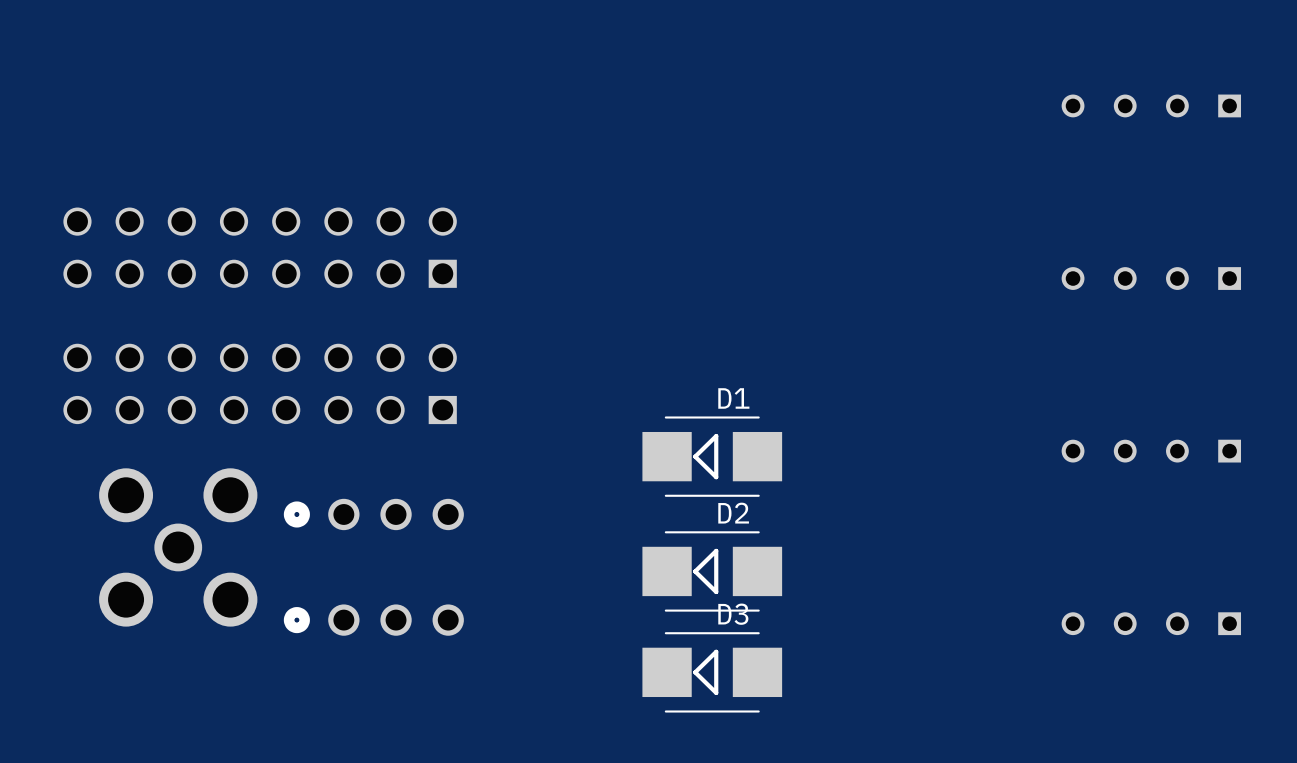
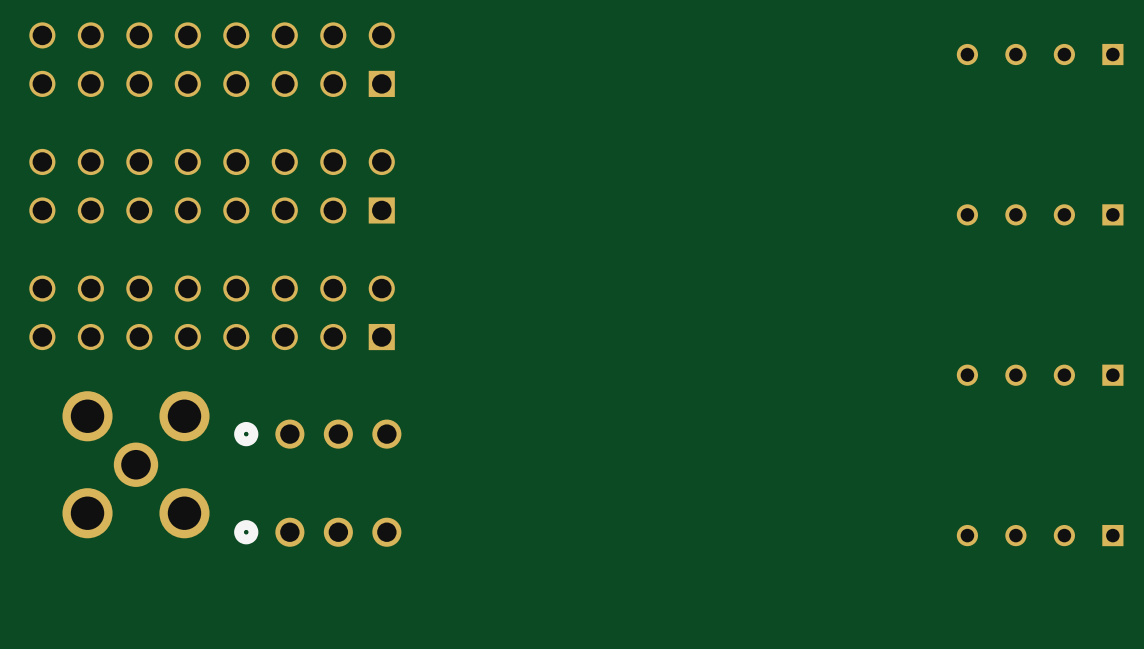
part: none -> (212, 59)
D1: (712, 456) -> none
D2: (712, 571) -> none
D3: (712, 672) -> none

